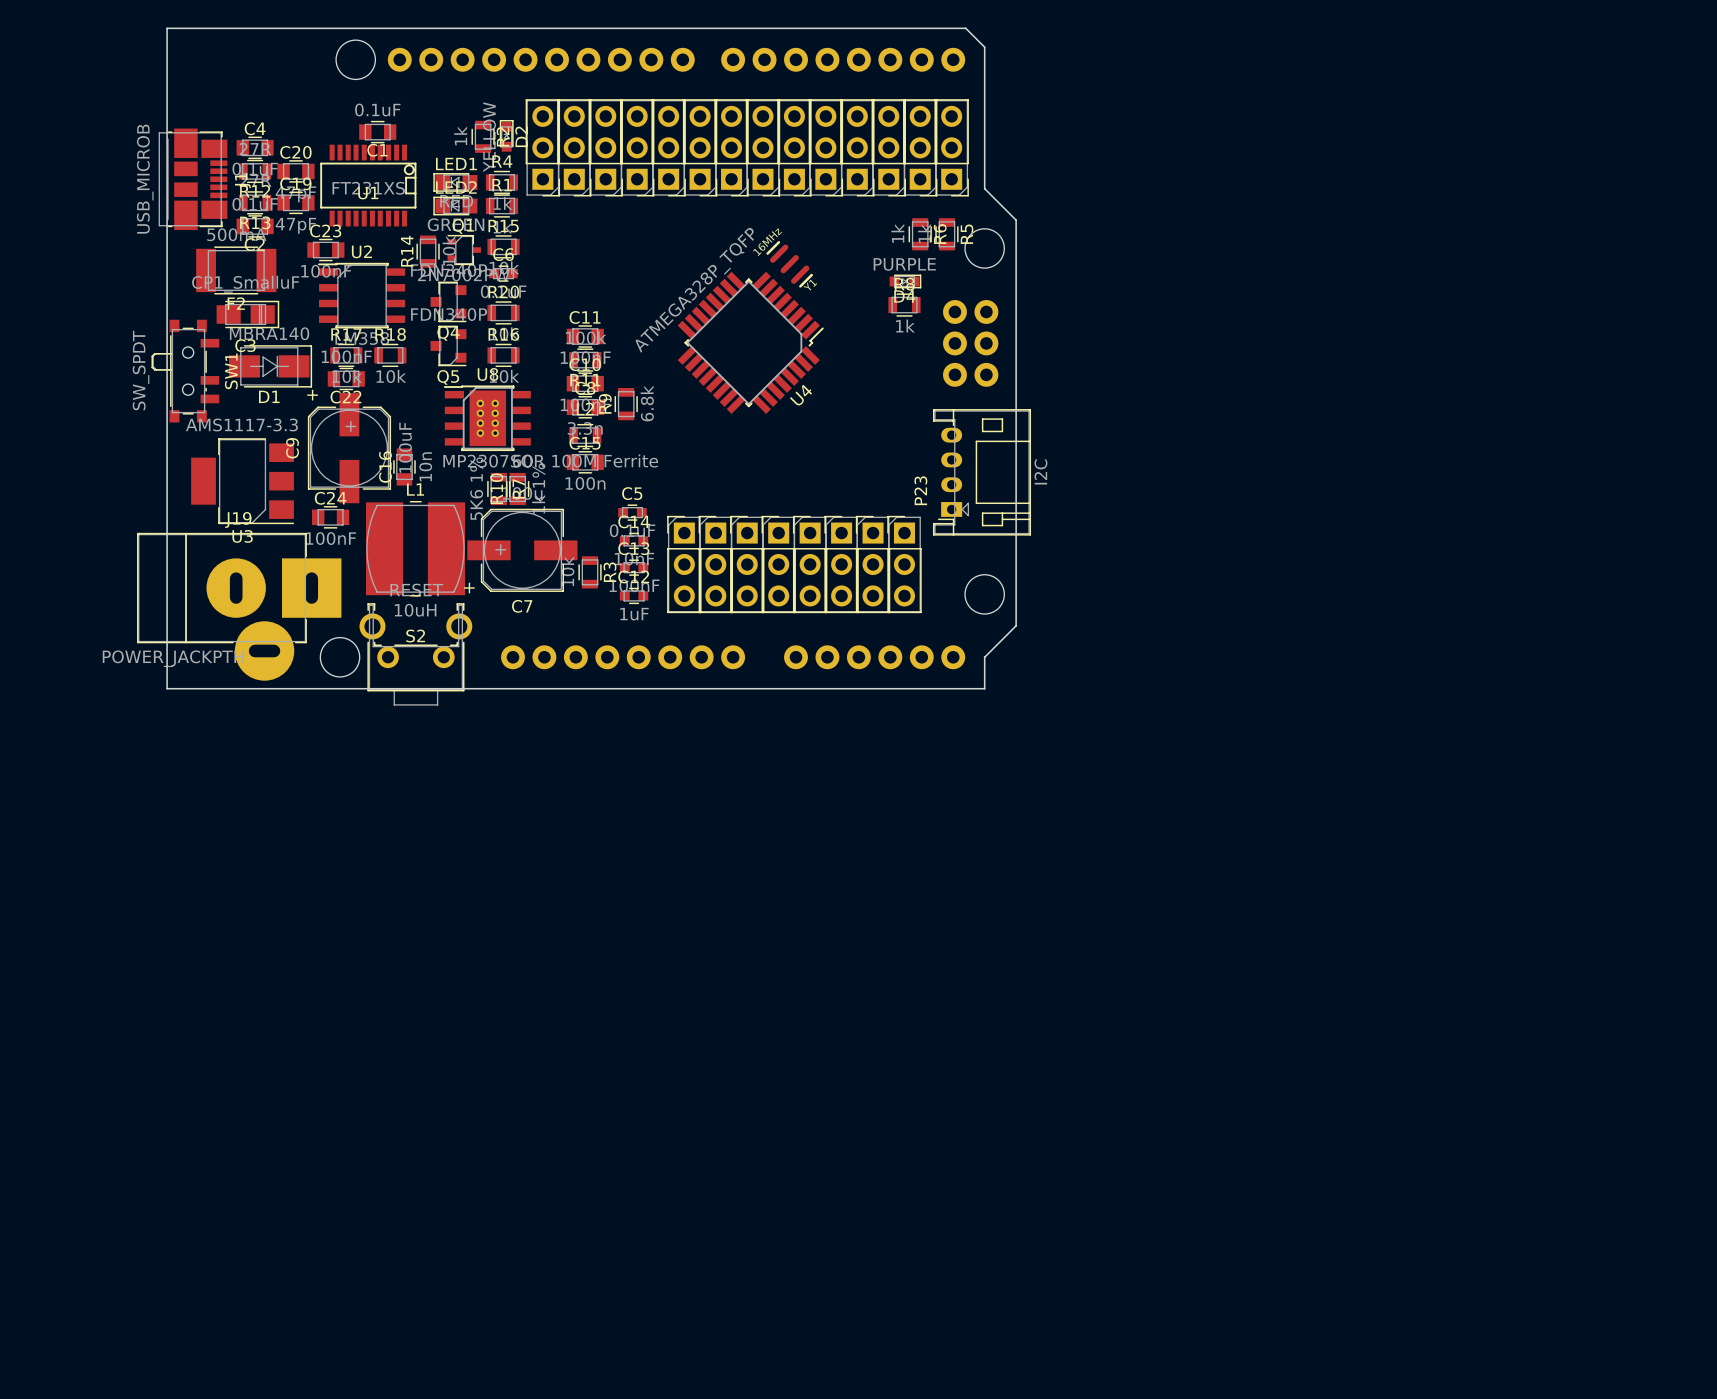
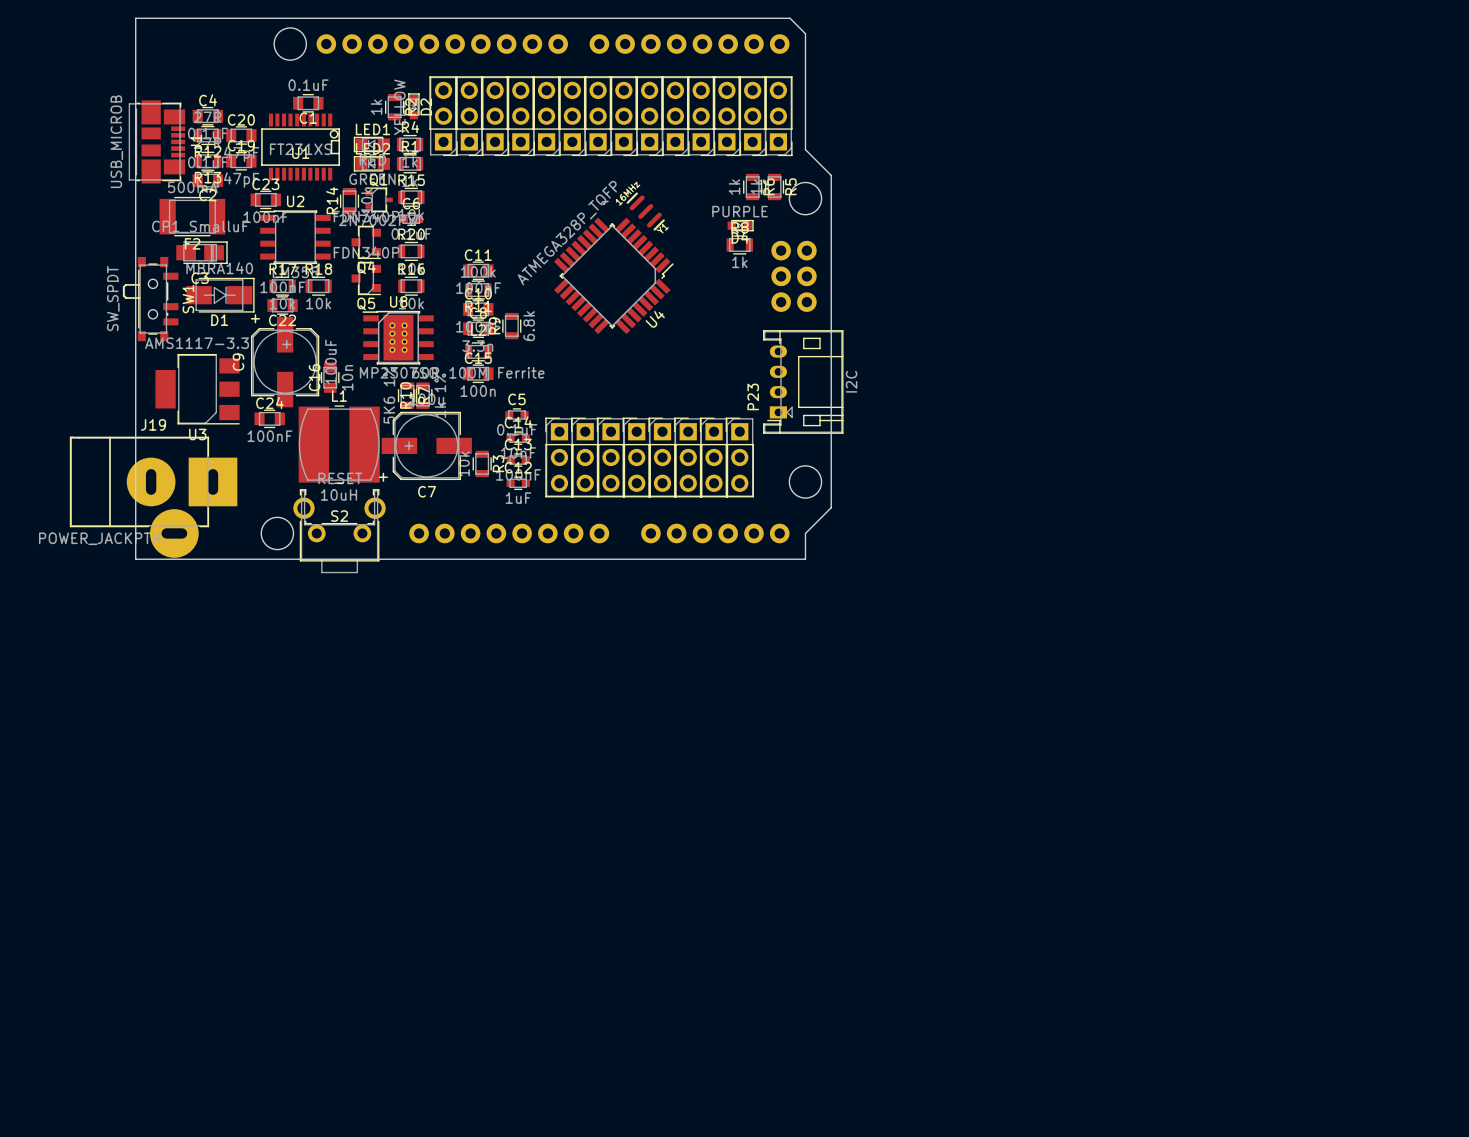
J19 position: (239, 606) -> (153, 497)

